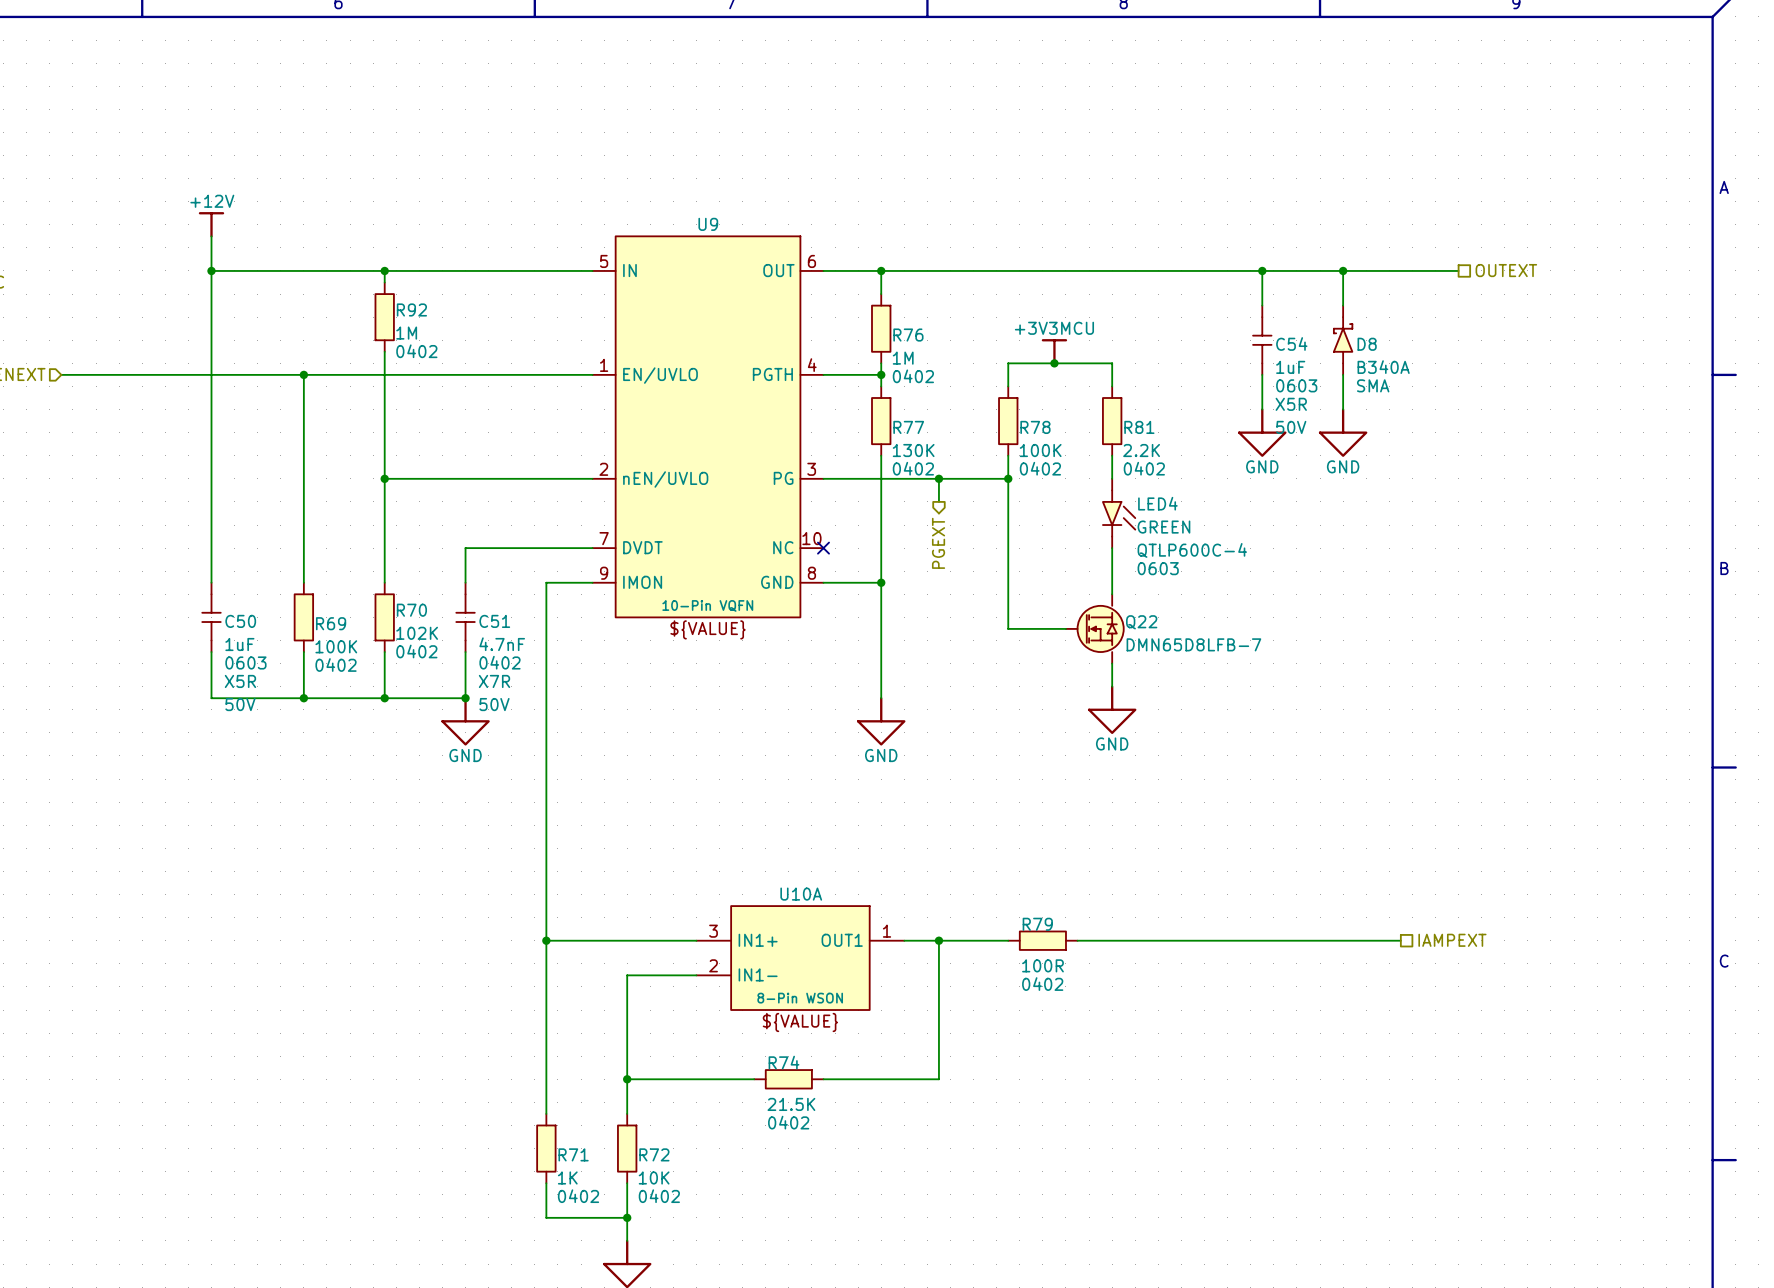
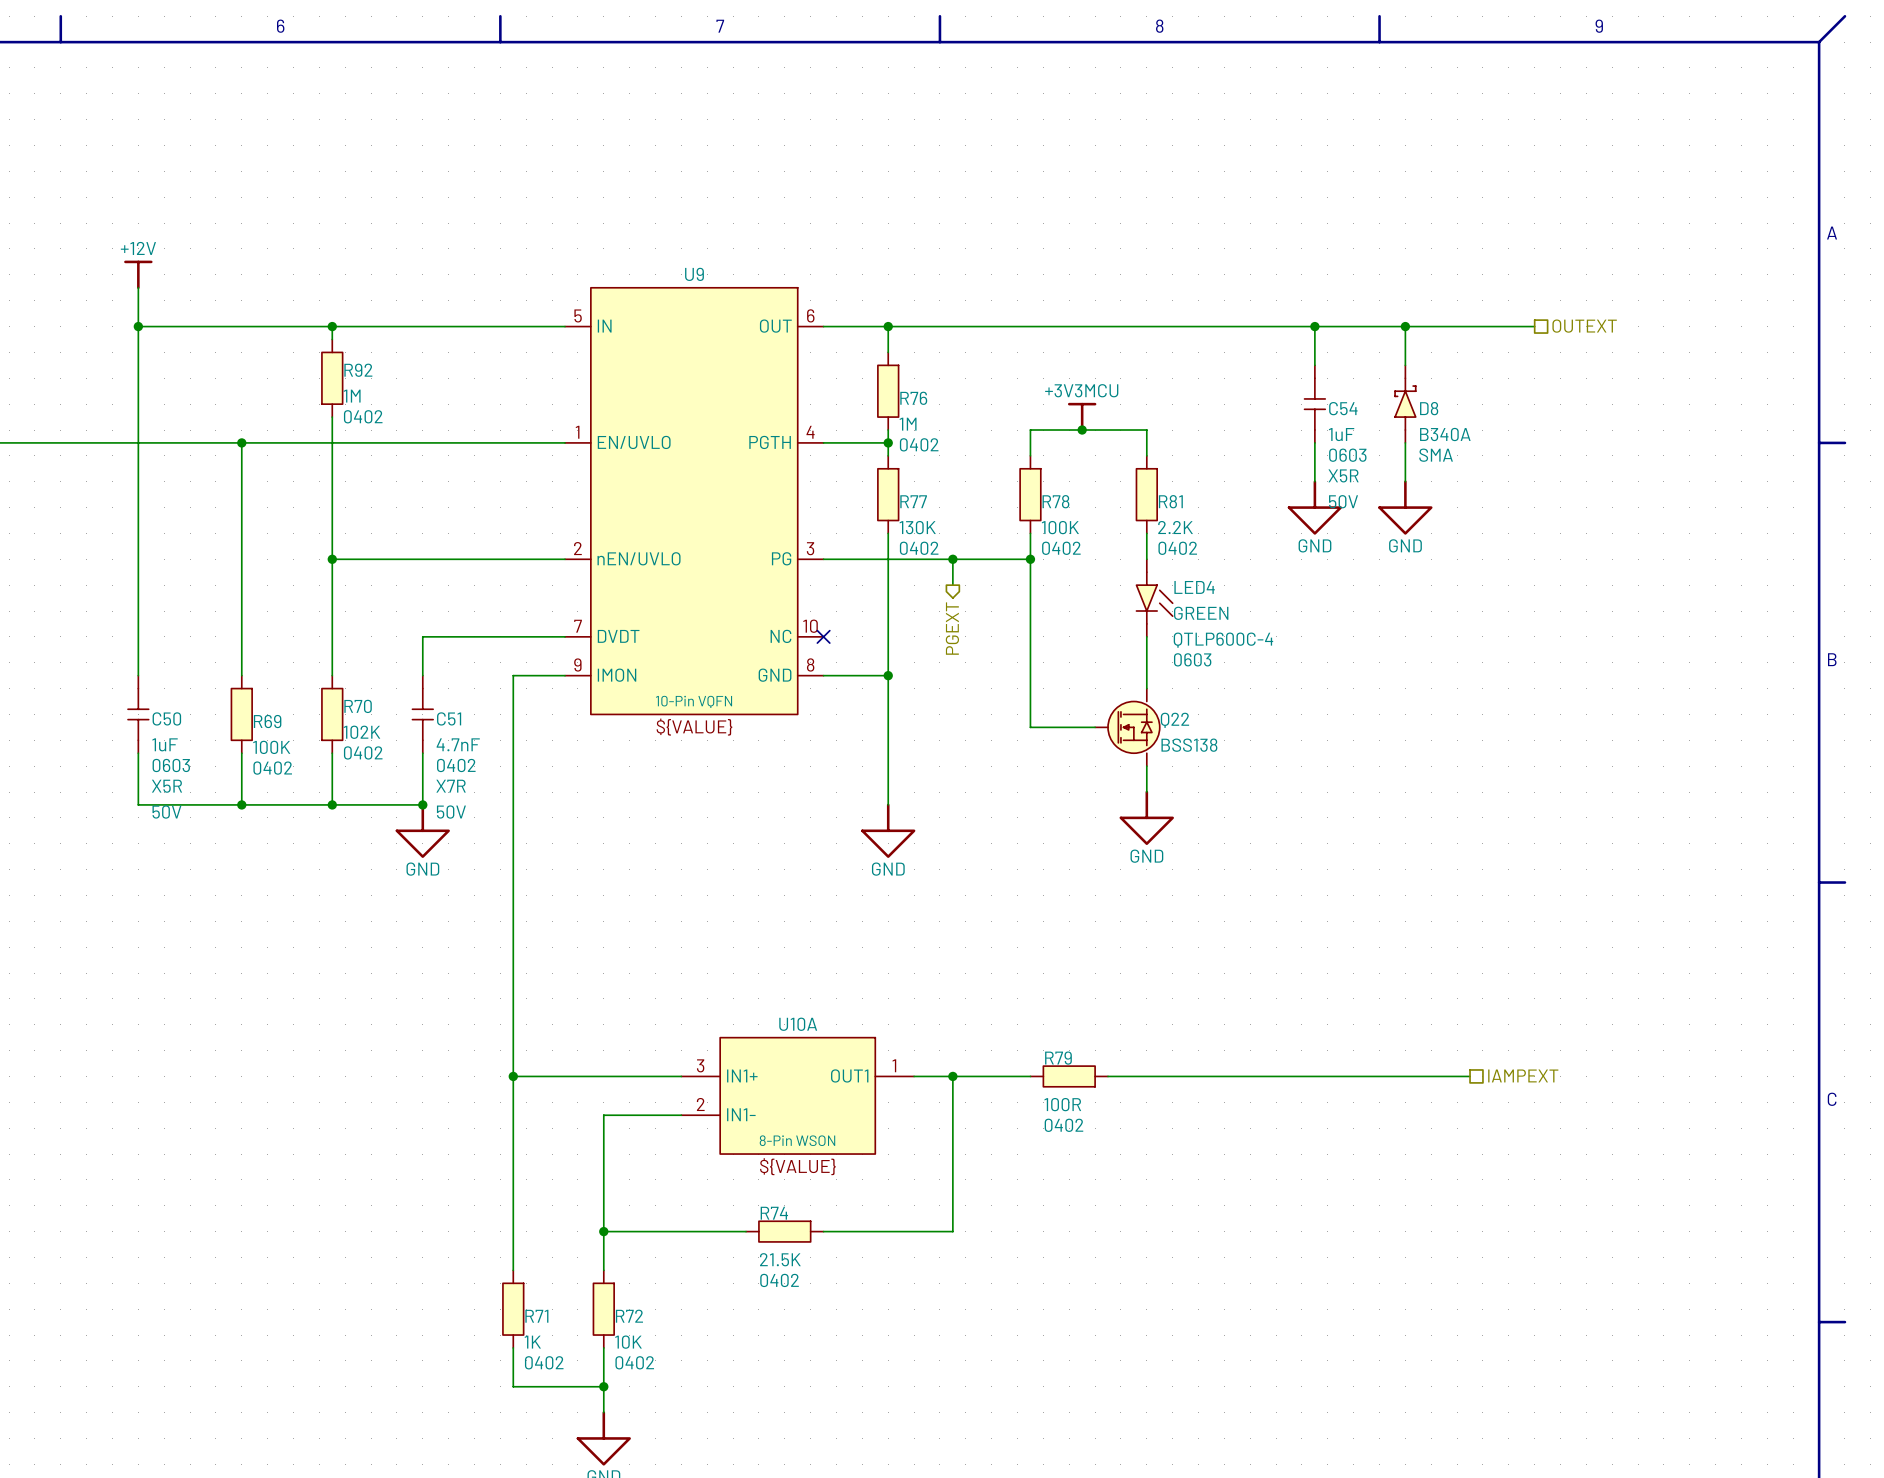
Q22 text: DMN65D8LFB-7 (1193, 644) -> BSS138 (1189, 745)

